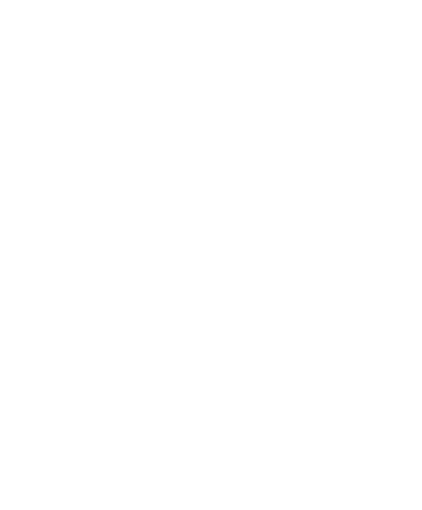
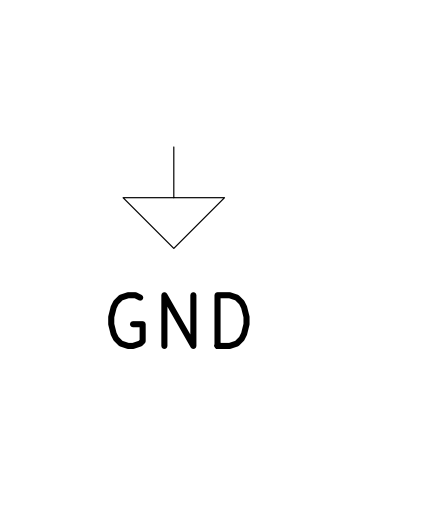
power symbol: none -> GND (173, 197)

